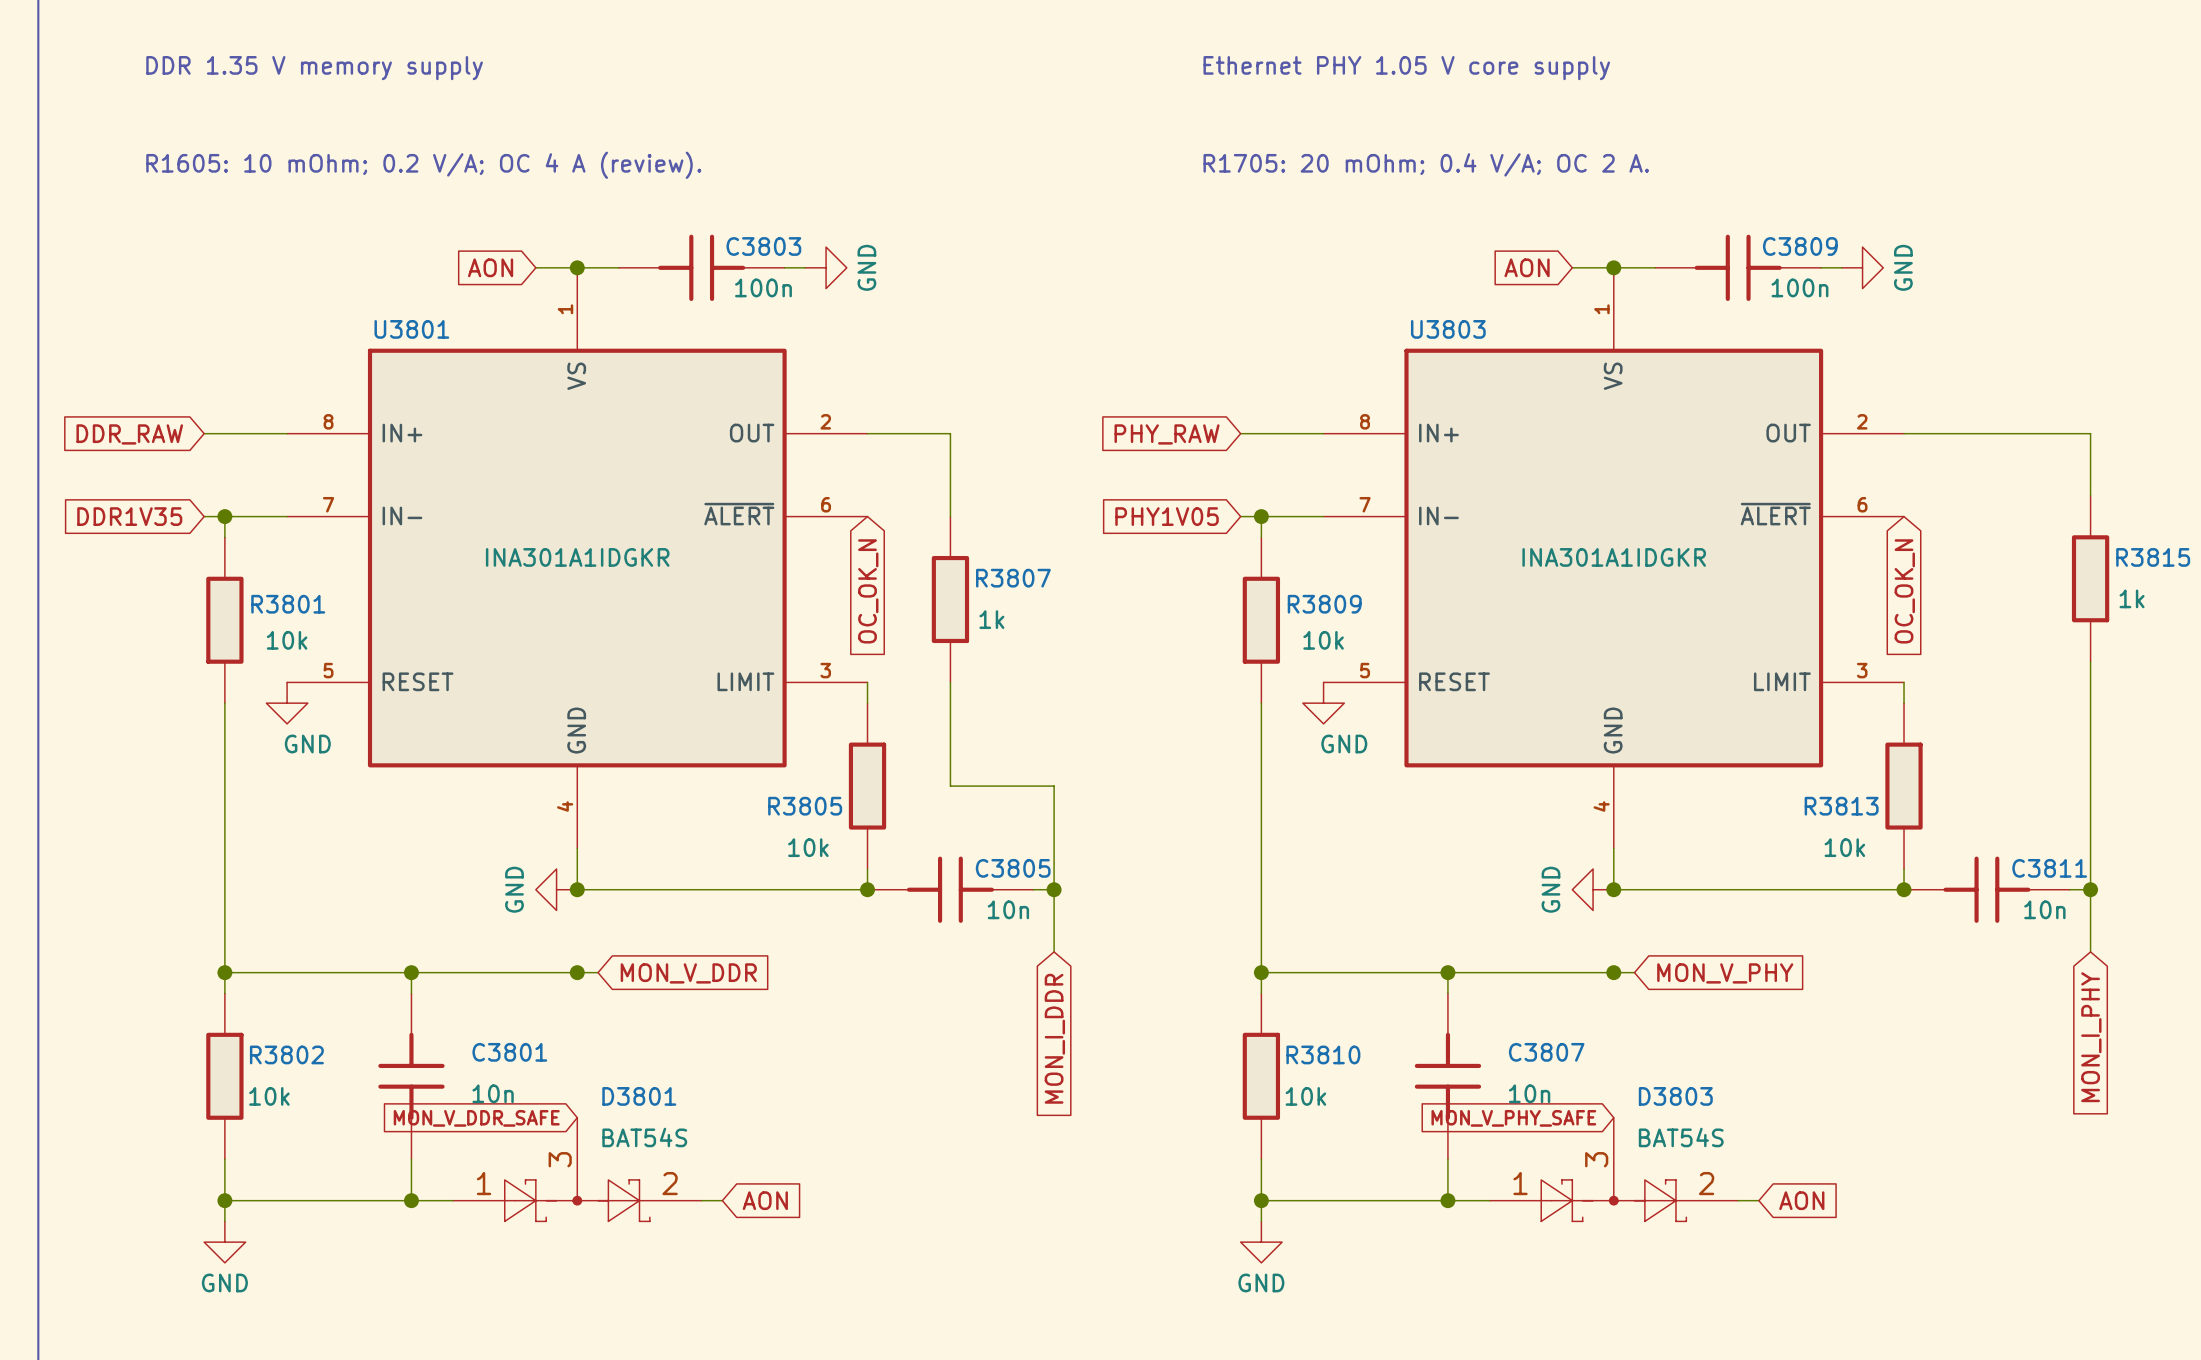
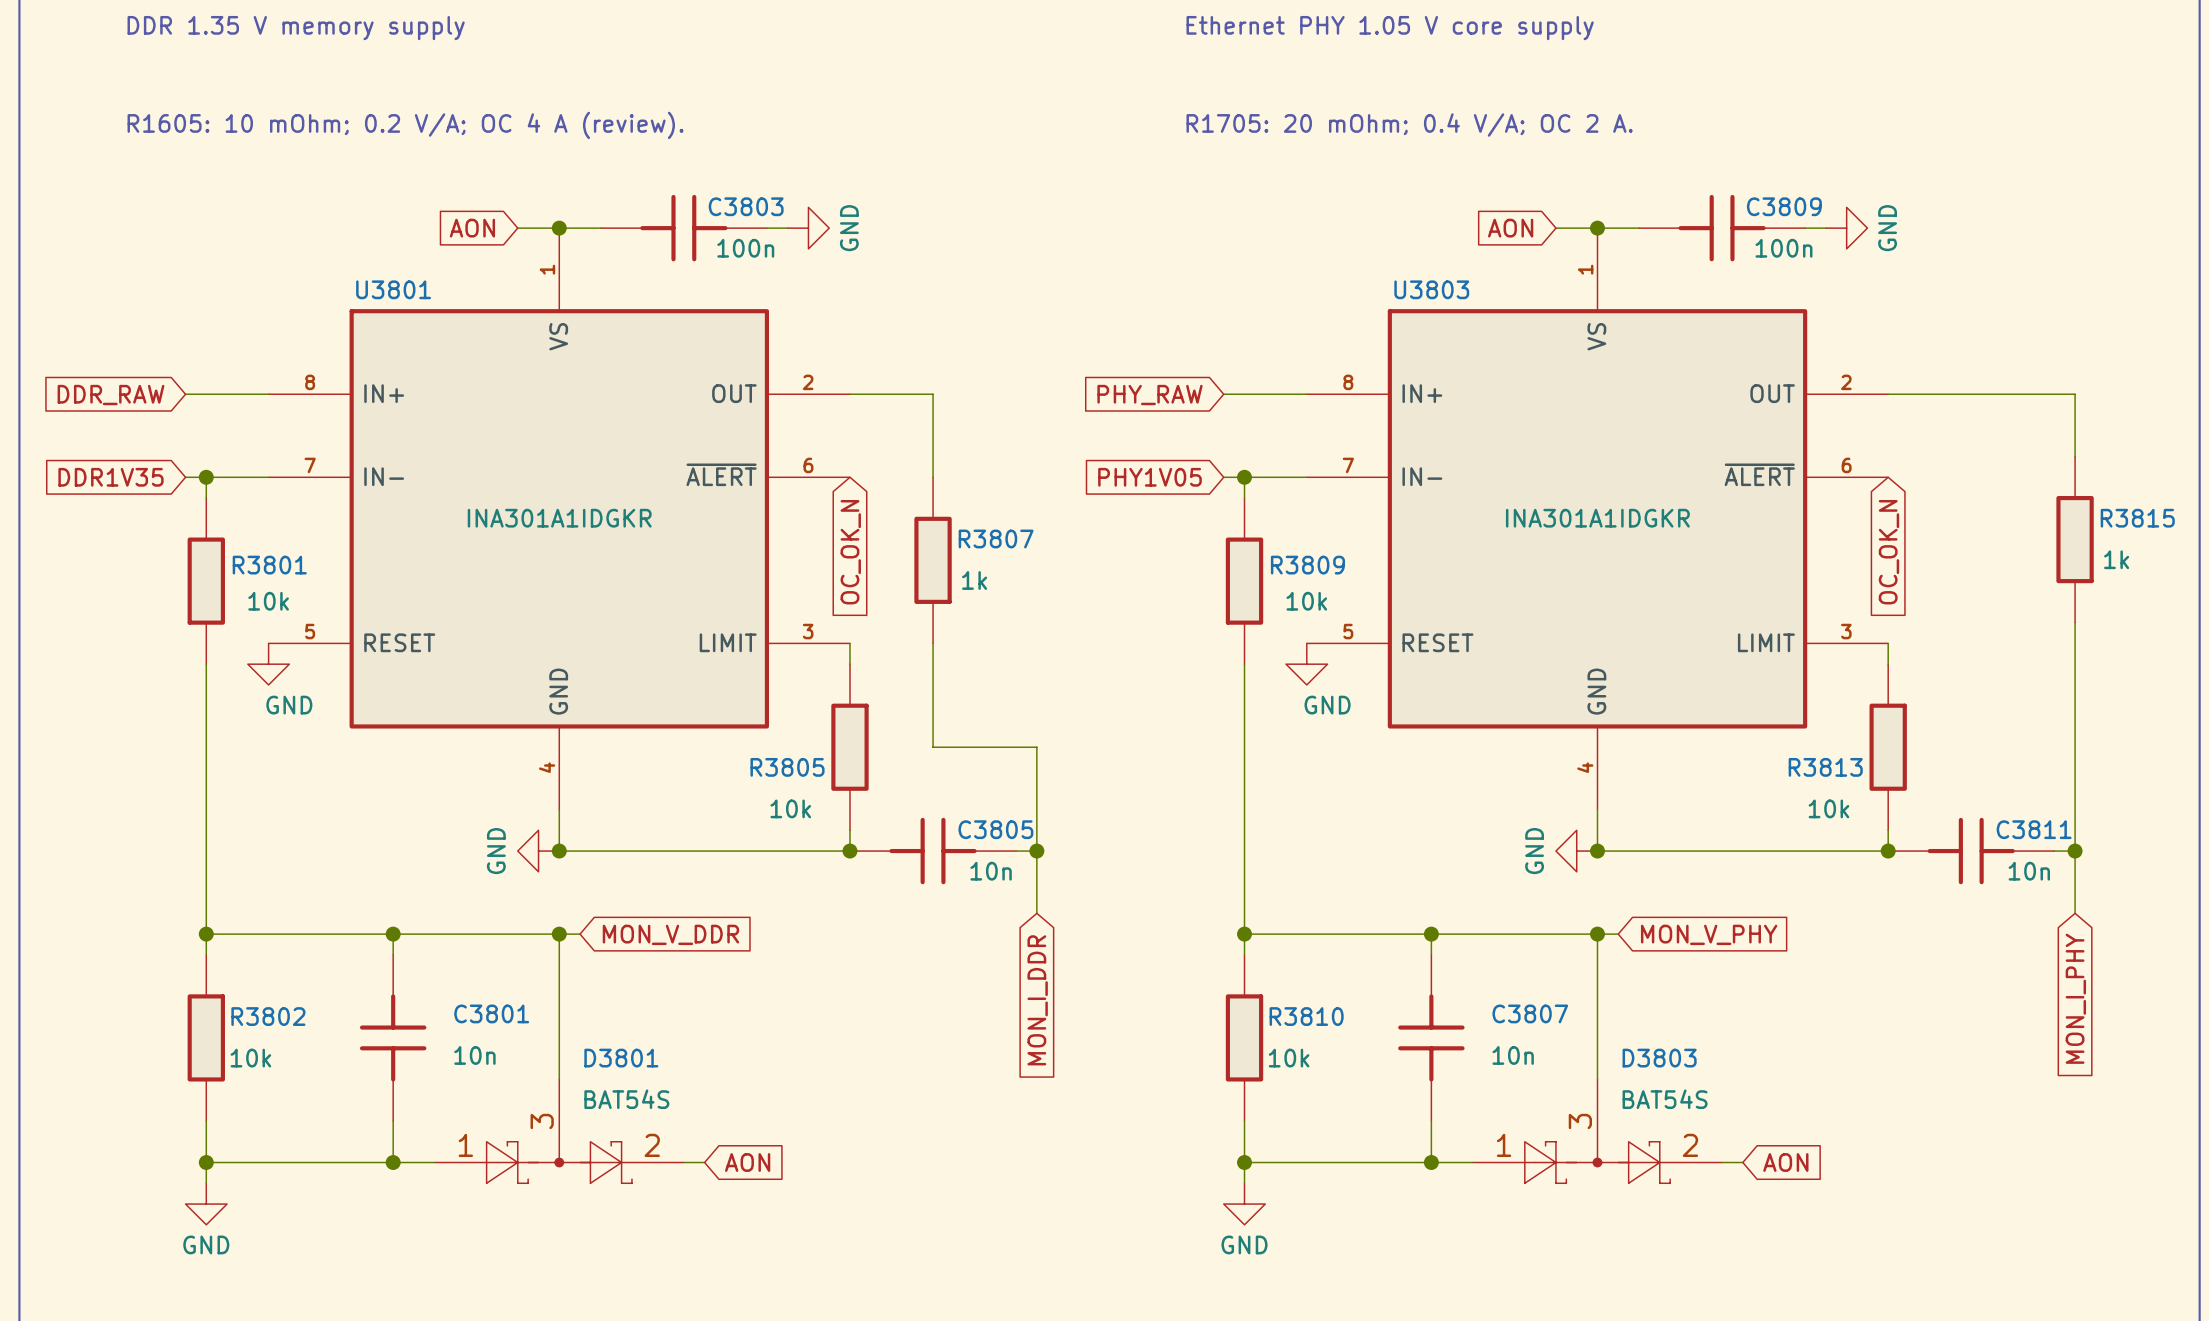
wire: none -> (559, 934) (559, 1079)
wire: none -> (1597, 934) (1597, 1079)
global label: MON_V_DDR_SAFE (476, 1118) -> none
global label: MON_V_PHY_SAFE (1513, 1118) -> none

